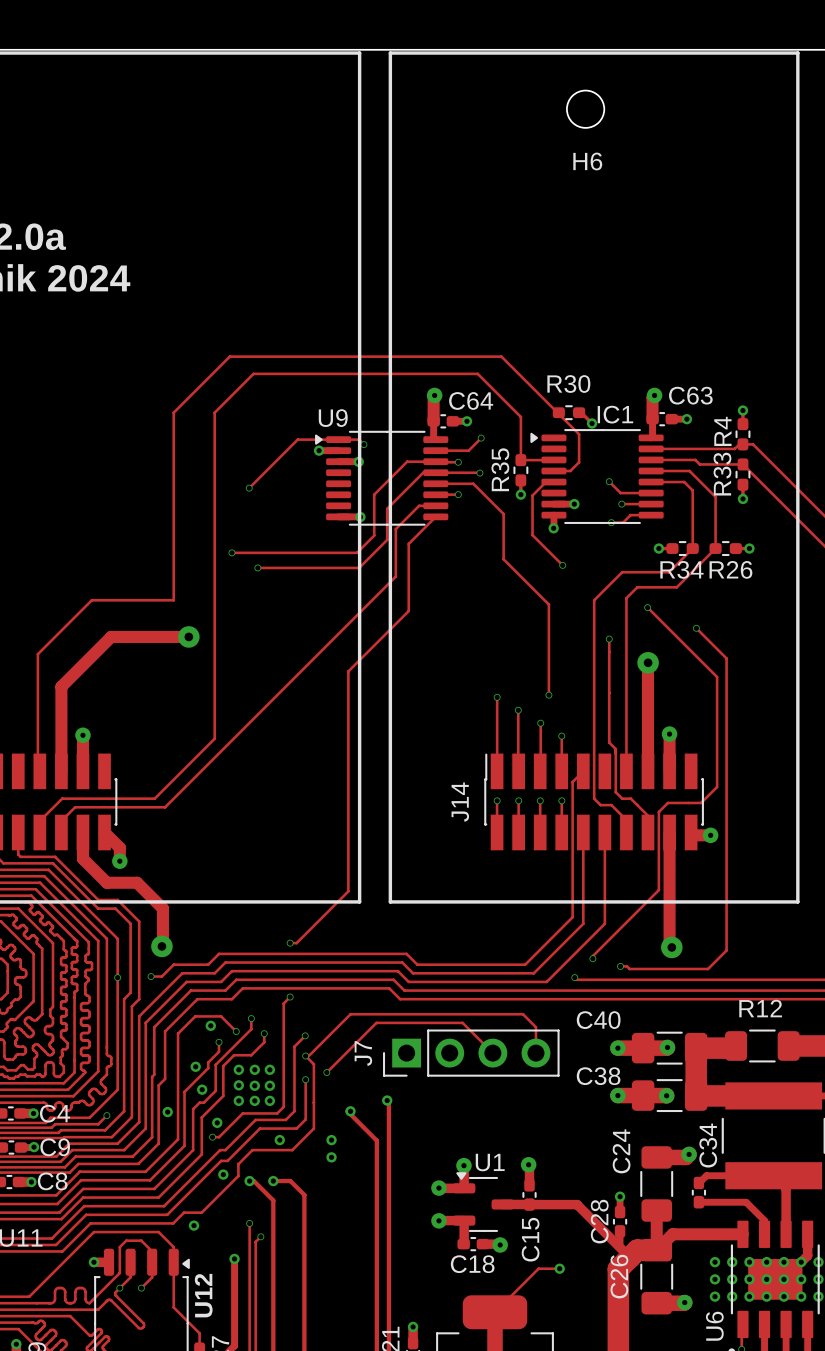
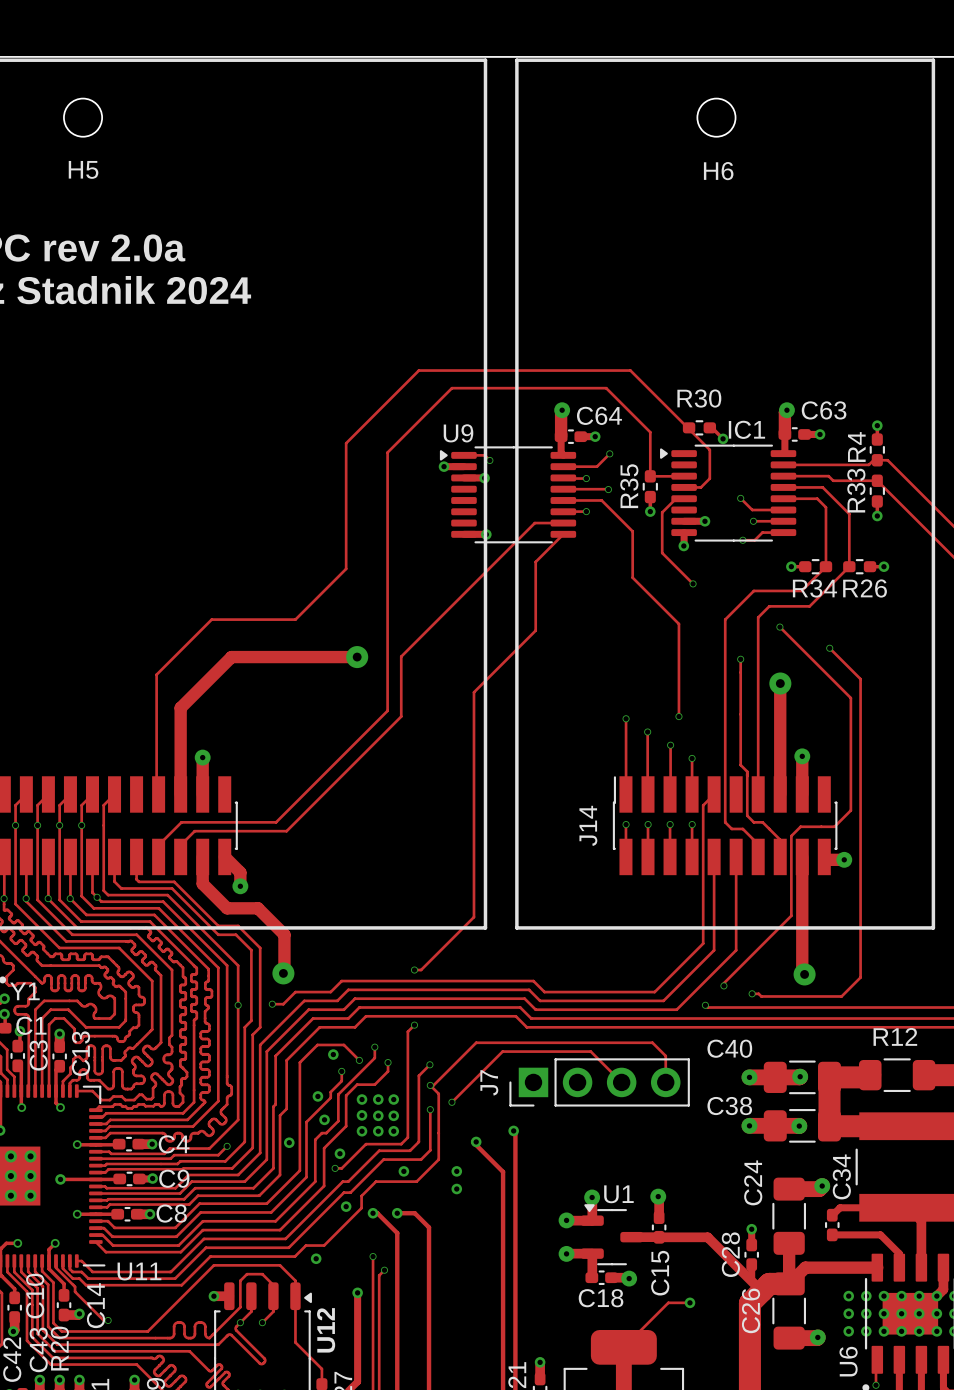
track: (294, 356) (229, 356) (173, 412) (173, 600) -> (418, 370) (346, 443) (346, 568) (295, 619)
track: (326, 373) (253, 373) (214, 412) (214, 738) -> (451, 388) (387, 452) (387, 710) (337, 761)
track: (338, 439) (297, 439) (249, 488) -> none
track: (435, 461) (407, 461) (374, 494) (374, 535) (357, 552) (231, 552) -> none
track: (435, 472) (423, 472) (387, 508) (387, 539) (359, 567) (257, 567) -> none
via: (249, 488) -> none
track: (419, 505) (395, 529) (395, 576) (277, 695) -> (546, 523) (534, 523) (401, 656) (401, 716)
via: (231, 552) -> none
via: (257, 567) -> none
track: none -> (310, 657) (357, 657)
via position: (188, 636) -> (357, 657)

